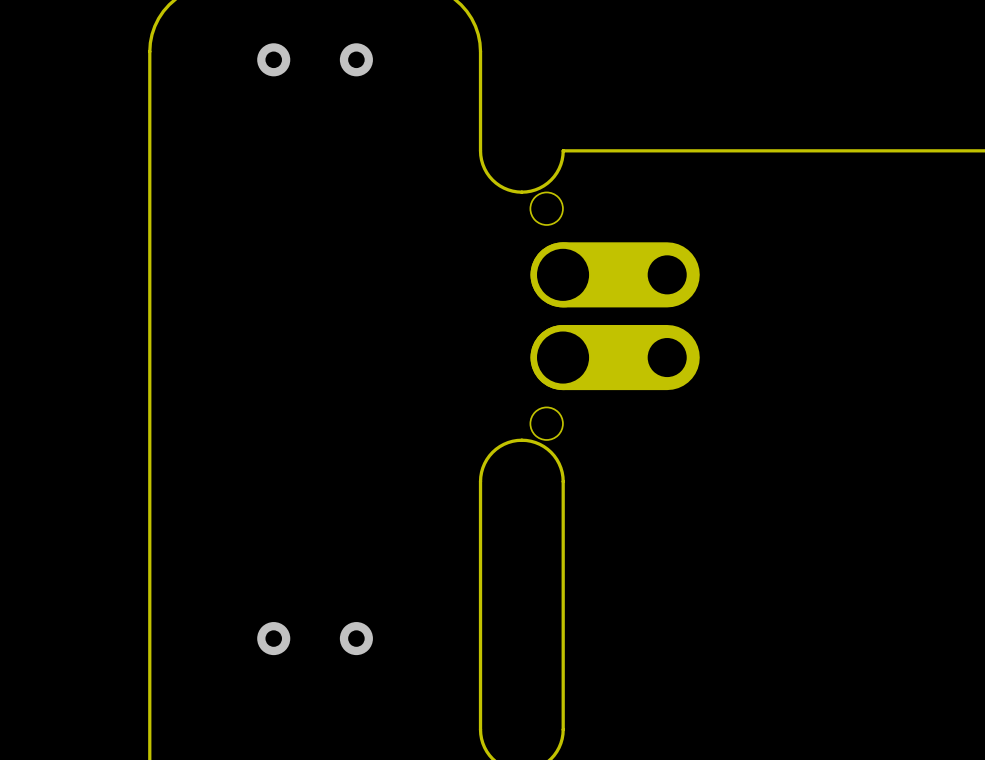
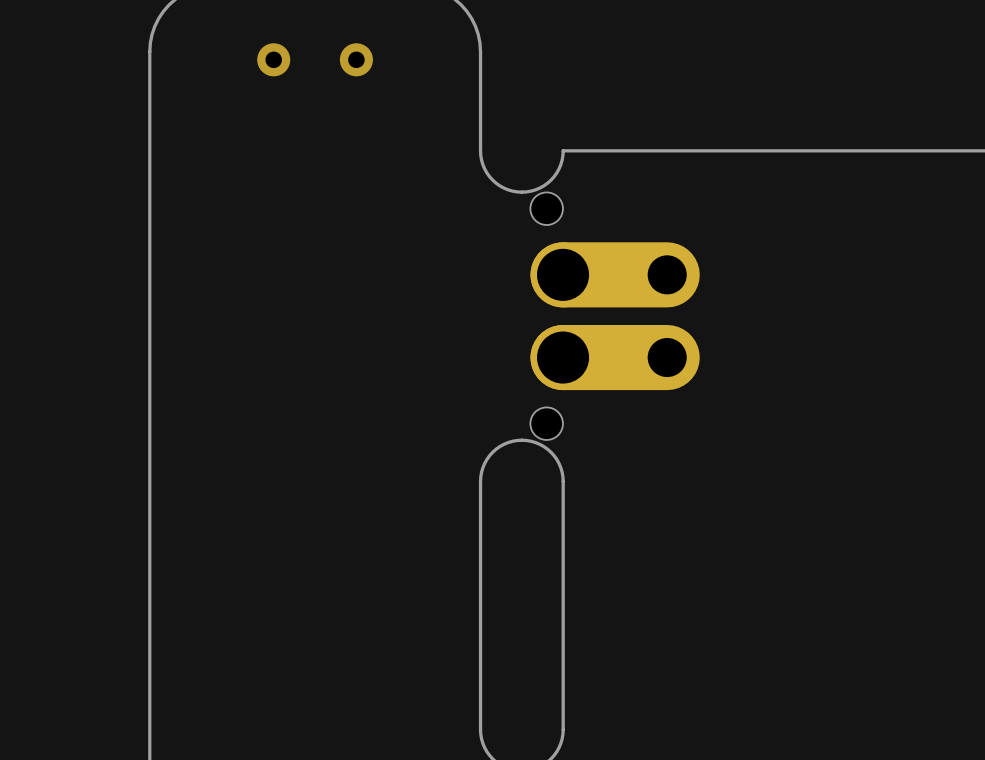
via: (273, 638) -> none
via: (356, 638) -> none

